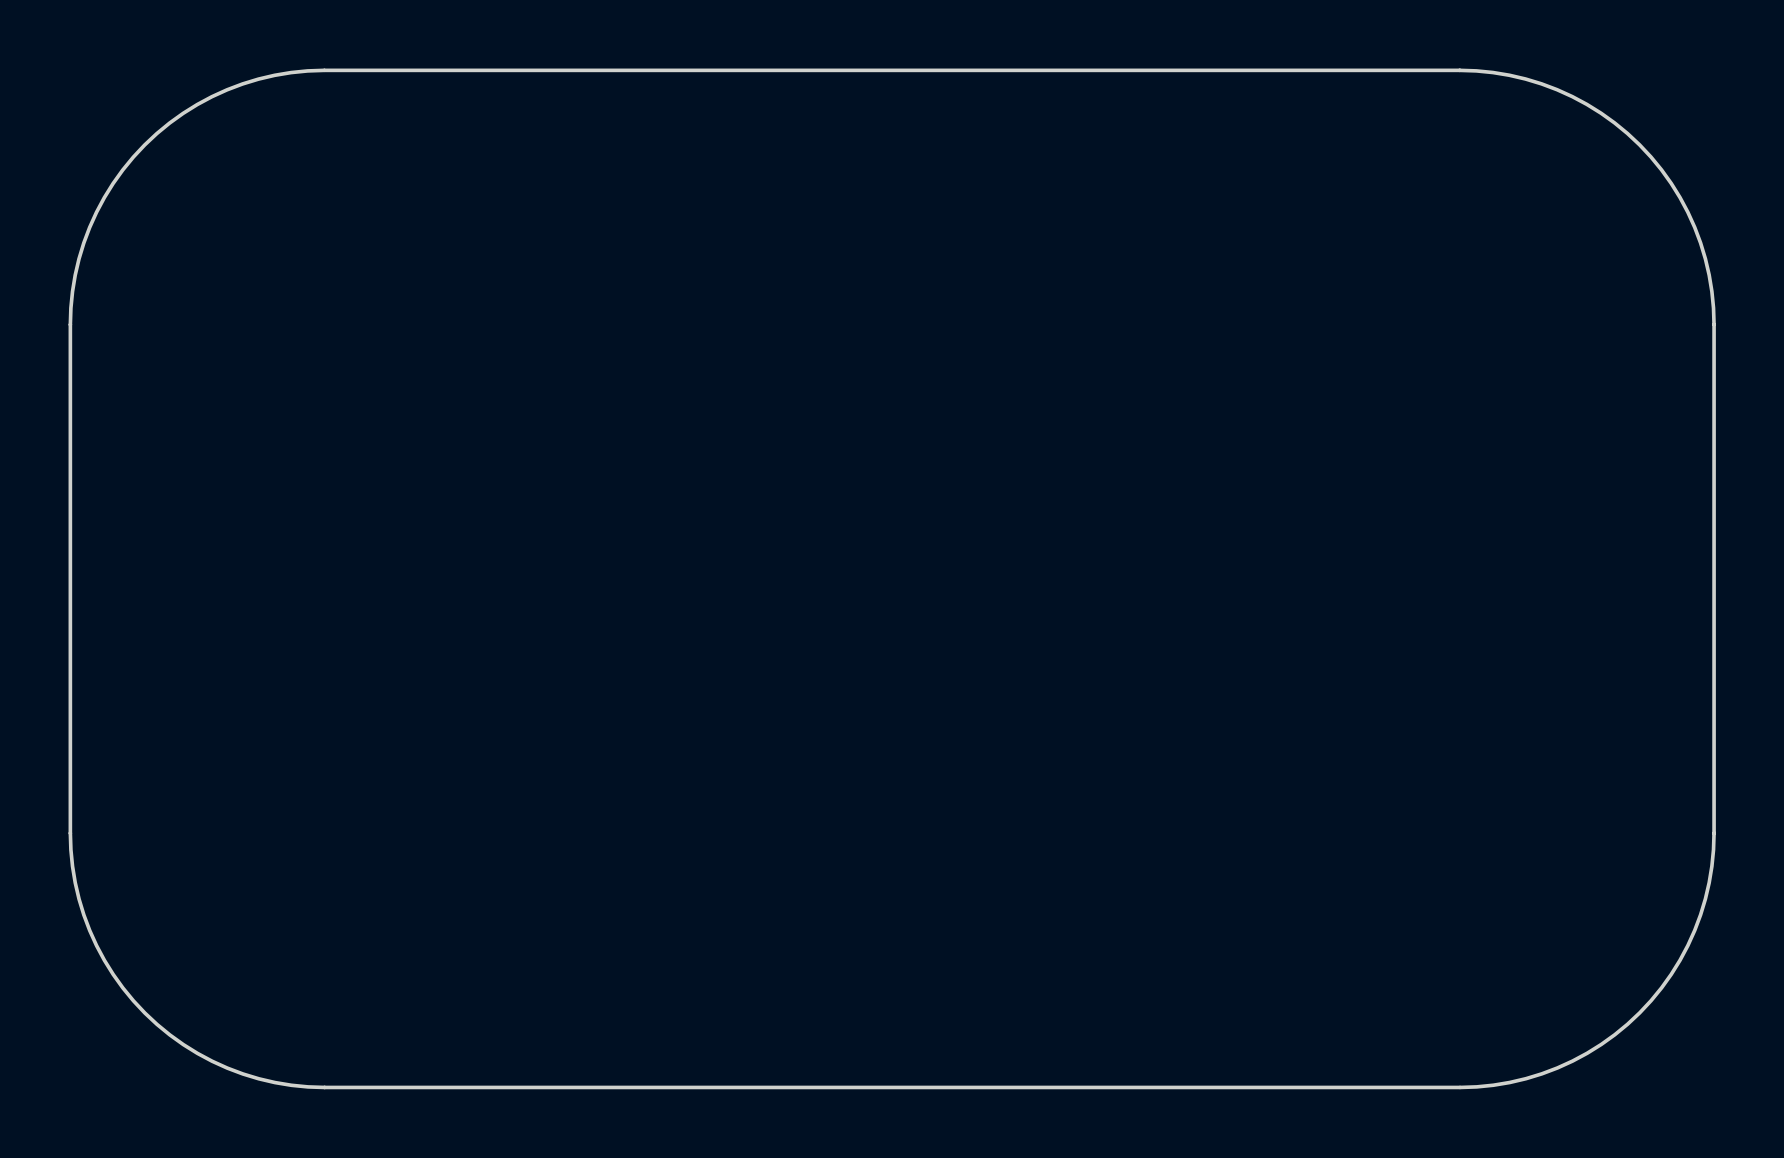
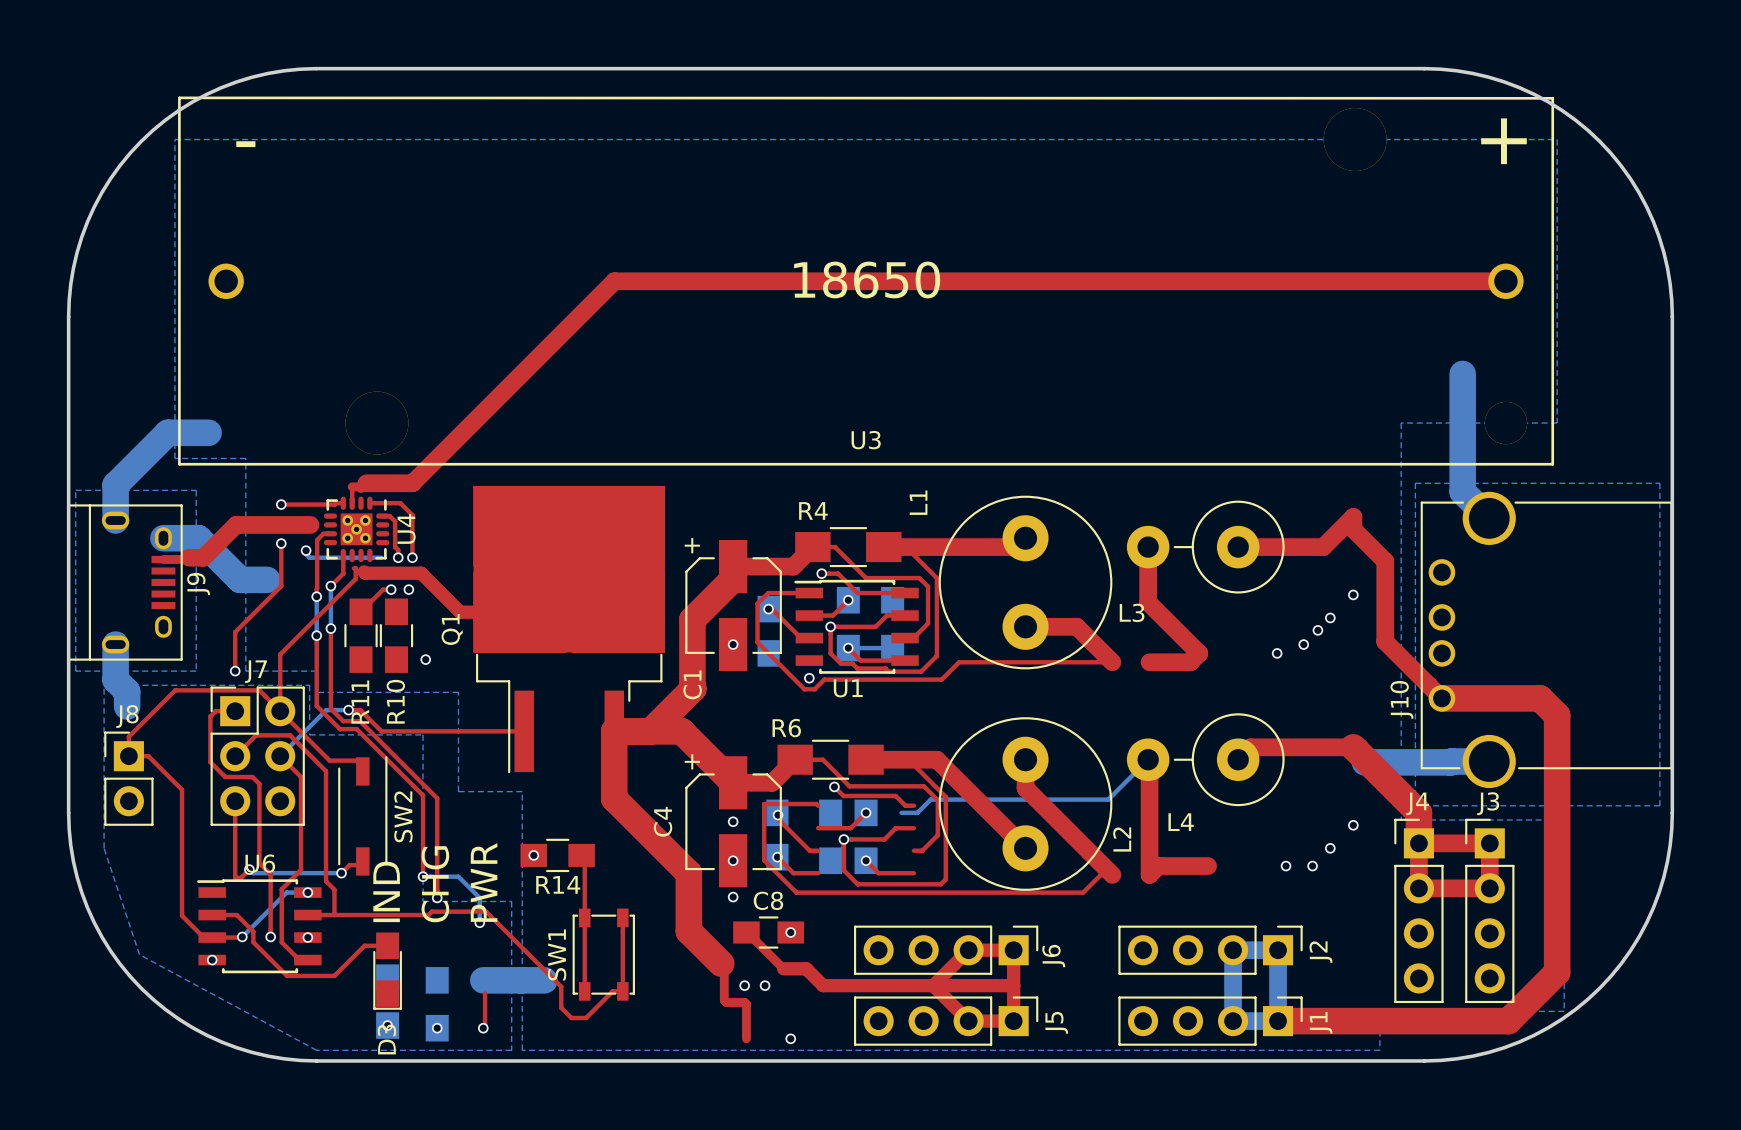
bottom zone outline: none -> (174, 139) (1557, 139) (1557, 423) (1401, 423) (1401, 819) (1564, 819) (1564, 1011) (1379, 1011) (1379, 1050) (522, 1050) (522, 791) (458, 791) (458, 692) (316, 692) (316, 671) (245, 671) (245, 458) (174, 458) (174, 139)
U3: none -> (866, 281)
top track: none -> (1505, 281) (614, 281) (412, 483) (366, 483) (361, 488) (366, 486) (362, 486) (352, 486) (352, 503)
bottom track: none -> (1462, 373) (1462, 491) (1489, 518)
bottom track: none -> (208, 432) (167, 432) (115, 485) (115, 520)
bottom zone outline: none -> (1415, 483) (1659, 483) (1659, 805) (1415, 805) (1415, 483)
bottom zone outline: none -> (75, 490) (196, 490) (196, 671) (75, 671) (75, 490)
top track: none -> (343, 503) (281, 504)
top track: none -> (369, 503) (400, 503) (412, 515) (412, 557)
via: none -> (281, 504)
top track: none -> (382, 516) (389, 516) (395, 521) (395, 547) (398, 550) (398, 557)
top track: none -> (310, 524) (236, 524) (203, 557) (163, 559)
U4: none -> (356, 529)
top track: none -> (330, 533) (323, 533) (317, 540) (316, 596)
bottom track: none -> (163, 538) (198, 538) (240, 579) (267, 579)
top track: none -> (1025, 538) (1016, 547) (883, 547) (905, 547) (936, 578) (936, 655) (921, 671) (888, 671) (885, 668) (857, 668) (852, 663) (840, 663) (830, 653) (830, 626) (875, 626) (886, 615) (905, 615)
top track: none -> (281, 543) (281, 586) (235, 632) (235, 671)
via: none -> (281, 543)
R4: none -> (848, 547)
top track: none -> (1148, 547) (1148, 602) (1199, 653) (1190, 662) (1149, 662)
L3: none -> (1205, 547)
top track: none -> (1238, 547) (1323, 547) (1353, 516) (1353, 529) (1385, 561) (1385, 641) (1441, 698) (1540, 698) (1557, 715) (1557, 972) (1508, 1021) (1278, 1021)
bottom track: none -> (306, 550) (306, 554) (309, 557) (381, 557)
via: none -> (306, 550)
top track: none -> (343, 555) (343, 573) (330, 586)
via: none -> (398, 557)
via: none -> (412, 557)
top track: none -> (353, 568) (355, 568) (355, 578) (280, 654) (280, 711)
top track: none -> (364, 571) (421, 573) (460, 612) (520, 612)
top track: none -> (821, 573) (838, 573) (857, 593) (905, 593)
via: none -> (821, 573)
J9: none -> (124, 582)
L1: none -> (1025, 582)
bottom track: none -> (330, 586) (330, 628)
via: none -> (330, 586)
top track: none -> (391, 589) (383, 589) (361, 611)
via: none -> (391, 589)
via: none -> (408, 589)
top track: none -> (809, 593) (768, 593) (757, 603) (757, 642) (804, 689) (814, 689) (824, 679) (941, 679) (959, 662) (1112, 662) (1076, 626) (1025, 626)
via: none -> (1353, 594)
bottom track: none -> (316, 596) (316, 635)
via: none -> (316, 596)
top track: none -> (848, 600) (833, 615) (809, 615)
via: none -> (848, 600)
C1: none -> (733, 605)
top track: none -> (768, 609) (771, 609) (800, 638) (809, 638)
via: none -> (768, 609)
via: none -> (1330, 617)
part: none -> (848, 624)
part: none -> (892, 624)
via: none -> (830, 626)
U1: none -> (856, 626)
top track: none -> (330, 628) (330, 708) (343, 721) (360, 721) (437, 798) (437, 897)
via: none -> (330, 628)
Q1: none -> (569, 629)
via: none -> (1317, 630)
part: none -> (768, 631)
top track: none -> (316, 635) (316, 705) (340, 729) (356, 729) (423, 795) (423, 876)
via: none -> (316, 635)
R11: none -> (361, 635)
R10: none -> (396, 635)
top track: none -> (905, 638) (913, 638) (928, 623) (928, 586) (919, 578) (866, 578) (835, 547) (812, 547) (793, 566) (733, 566) (733, 578) (692, 619) (693, 688) (650, 731)
J10: none -> (1546, 639)
bottom track: none -> (115, 644) (115, 679) (127, 691) (127, 706)
via: none -> (733, 644)
via: none -> (1303, 644)
top track: none -> (848, 648) (860, 660) (905, 660)
bottom track: none -> (848, 648) (892, 648)
via: none -> (848, 648)
via: none -> (1277, 653)
via: none -> (425, 659)
via: none -> (235, 671)
via: none -> (809, 678)
bottom zone outline: none -> (104, 685) (309, 685) (309, 734) (423, 734) (423, 901) (511, 901) (511, 1050) (316, 1050) (139, 954) (104, 848) (104, 685)
top track: none -> (348, 710) (360, 710) (381, 731) (524, 731)
bottom track: none -> (348, 710) (326, 710) (280, 756)
via: none -> (348, 710)
top track: none -> (235, 711) (215, 711) (210, 716) (210, 762) (225, 777) (252, 777) (259, 783) (259, 863) (270, 874) (270, 936)
top track: none -> (1353, 747) (1418, 812) (1418, 843)
top track: none -> (1360, 747) (1250, 747) (1238, 759)
top track: none -> (235, 756) (256, 735) (290, 735) (326, 771) (326, 881) (334, 889) (334, 915)
J7: none -> (257, 756)
top track: none -> (280, 756) (301, 777) (301, 869) (281, 889) (281, 942) (299, 960) (307, 960)
R6: none -> (830, 759)
top track: none -> (1025, 759) (1025, 788) (1112, 874) (1100, 874) (1083, 892) (796, 892) (764, 860) (764, 804) (816, 804) (818, 805)
top track: none -> (1148, 759) (1149, 874) (1158, 866) (1208, 866)
bottom track: none -> (1148, 759) (1108, 799) (930, 799) (917, 812) (901, 812)
L4: none -> (1205, 759)
top track: none -> (362, 760) (329, 760) (259, 690) (175, 690) (128, 736) (128, 756) (148, 756) (182, 789) (182, 915) (203, 937) (242, 936)
bottom track: none -> (1489, 761) (1364, 762)
J8: none -> (128, 778)
top track: none -> (834, 786) (843, 795) (895, 795) (905, 805) (913, 805)
via: none -> (834, 786)
top track: none -> (235, 801) (235, 877) (241, 877) (249, 869)
L2: none -> (1025, 804)
top track: none -> (866, 812) (850, 828) (818, 828)
via: none -> (866, 812)
top track: none -> (778, 815) (778, 818) (809, 850) (818, 850)
via: none -> (778, 815)
SW2: none -> (362, 815)
C4: none -> (733, 821)
via: none -> (733, 821)
via: none -> (1353, 825)
top track: none -> (913, 828) (895, 828) (884, 839) (843, 839) (843, 870) (857, 884) (940, 884) (945, 879) (945, 796) (908, 759) (866, 759) (936, 759) (1025, 848)
part: none -> (777, 835)
part: none -> (830, 836)
part: none -> (866, 836)
via: none -> (843, 839)
top track: none -> (1418, 843) (1418, 888) (1489, 888) (1489, 843) (1418, 843)
via: none -> (1330, 848)
top track: none -> (913, 850) (922, 850) (937, 835) (937, 800) (923, 786) (849, 786) (822, 759) (795, 759) (772, 782) (733, 782) (681, 731) (614, 731) (614, 798) (688, 873) (688, 931) (726, 968) (724, 970) (724, 1000) (726, 1002) (744, 1002) (746, 1004) (746, 1038)
via: none -> (533, 855)
R14: none -> (557, 855)
top track: none -> (581, 855) (584, 858) (584, 991)
top track: none -> (777, 857) (793, 873) (818, 873)
via: none -> (777, 857)
via: none -> (733, 860)
top track: none -> (866, 860) (878, 873) (913, 873)
via: none -> (866, 860)
top track: none -> (362, 865) (349, 865) (341, 873)
via: none -> (1286, 866)
via: none -> (1312, 866)
bottom track: none -> (249, 869) (252, 873) (341, 873)
via: none -> (249, 869)
via: none -> (341, 873)
bottom track: none -> (423, 876) (458, 876) (479, 897) (479, 922)
via: none -> (423, 876)
text: none -> CHG (435, 884)
text: none -> PWR (484, 882)
bottom track: none -> (307, 892) (286, 892) (242, 936)
via: none -> (307, 892)
text: none -> IND (386, 891)
via: none -> (733, 897)
via: none -> (437, 897)
J4: none -> (1418, 910)
J3: none -> (1489, 910)
top track: none -> (212, 915) (236, 915) (253, 931) (253, 942) (287, 975) (334, 975) (364, 945) (387, 945)
top track: none -> (307, 915) (428, 915) (431, 911) (486, 911) (561, 986) (561, 1007) (571, 1018) (586, 1018) (612, 991) (622, 991) (622, 917)
via: none -> (479, 922)
U6: none -> (259, 926)
top track: none -> (746, 932) (783, 968) (806, 968) (823, 985) (1013, 985)
C8: none -> (768, 932)
via: none -> (790, 932)
via: none -> (242, 936)
via: none -> (270, 936)
via: none -> (307, 937)
J6: none -> (946, 950)
top track: none -> (968, 950) (1013, 950) (1013, 1021) (968, 1021) (933, 985) (968, 950)
J2: none -> (1210, 950)
bottom track: none -> (1233, 950) (1233, 1021) (1278, 1021) (1278, 950) (1233, 950)
SW1: none -> (603, 954)
via: none -> (212, 960)
D3: none -> (387, 971)
bottom track: none -> (483, 980) (544, 980)
via: none -> (744, 985)
via: none -> (765, 985)
top track: none -> (485, 993) (485, 1026) (483, 1028)
part: none -> (387, 1001)
part: none -> (437, 1004)
J5: none -> (946, 1021)
J1: none -> (1210, 1021)
via: none -> (387, 1025)
via: none -> (437, 1028)
via: none -> (483, 1028)
via: none -> (790, 1038)

